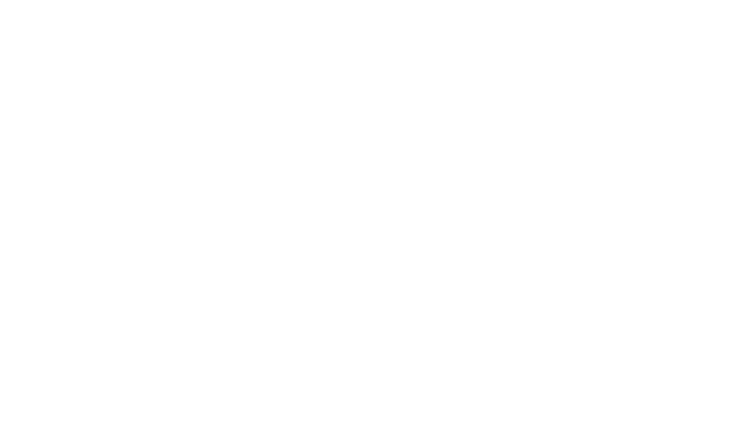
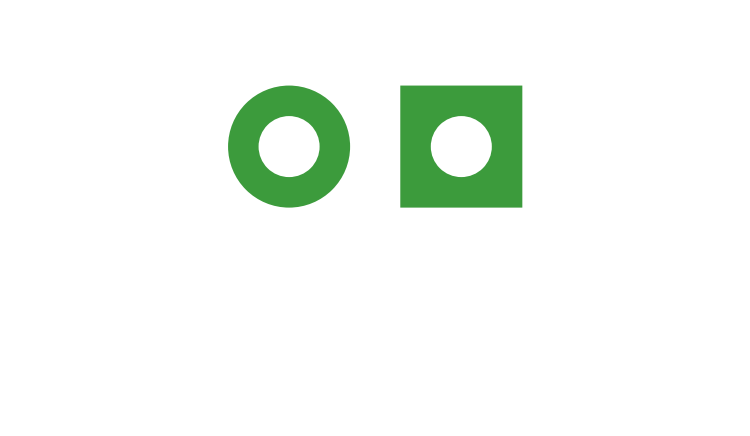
part: none -> (375, 146)

